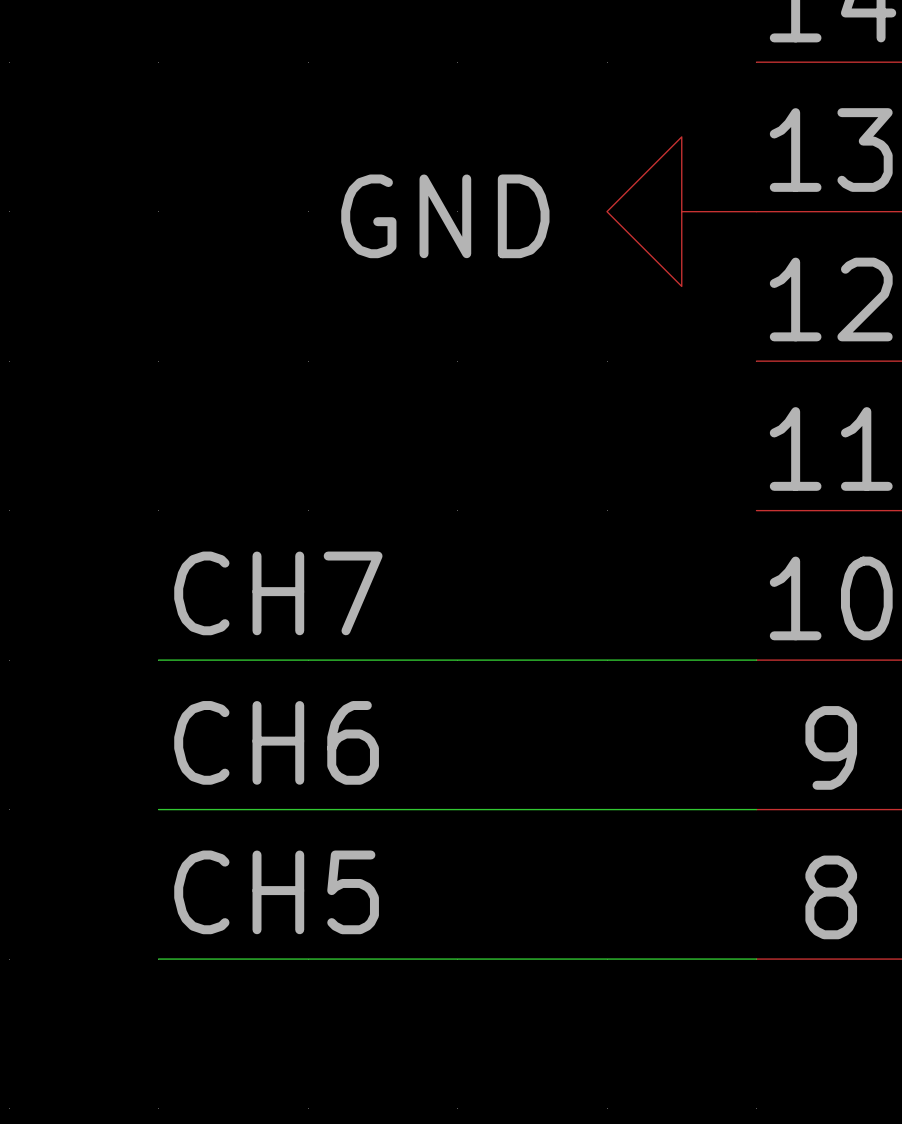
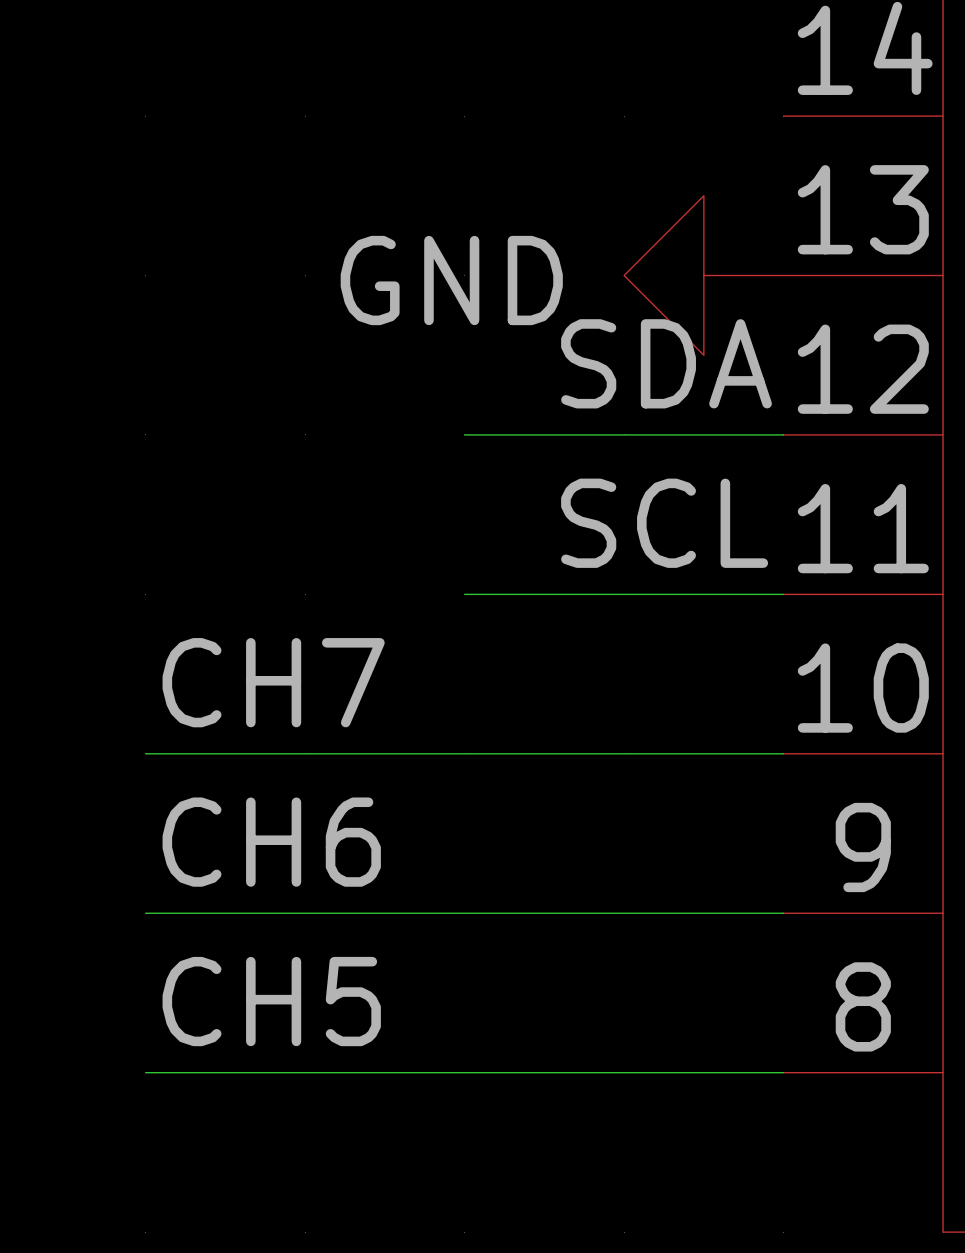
label: none -> SDA (666, 363)
wire: none -> (464, 434) (783, 434)
label: none -> SCL (664, 523)
wire: none -> (464, 594) (783, 594)

